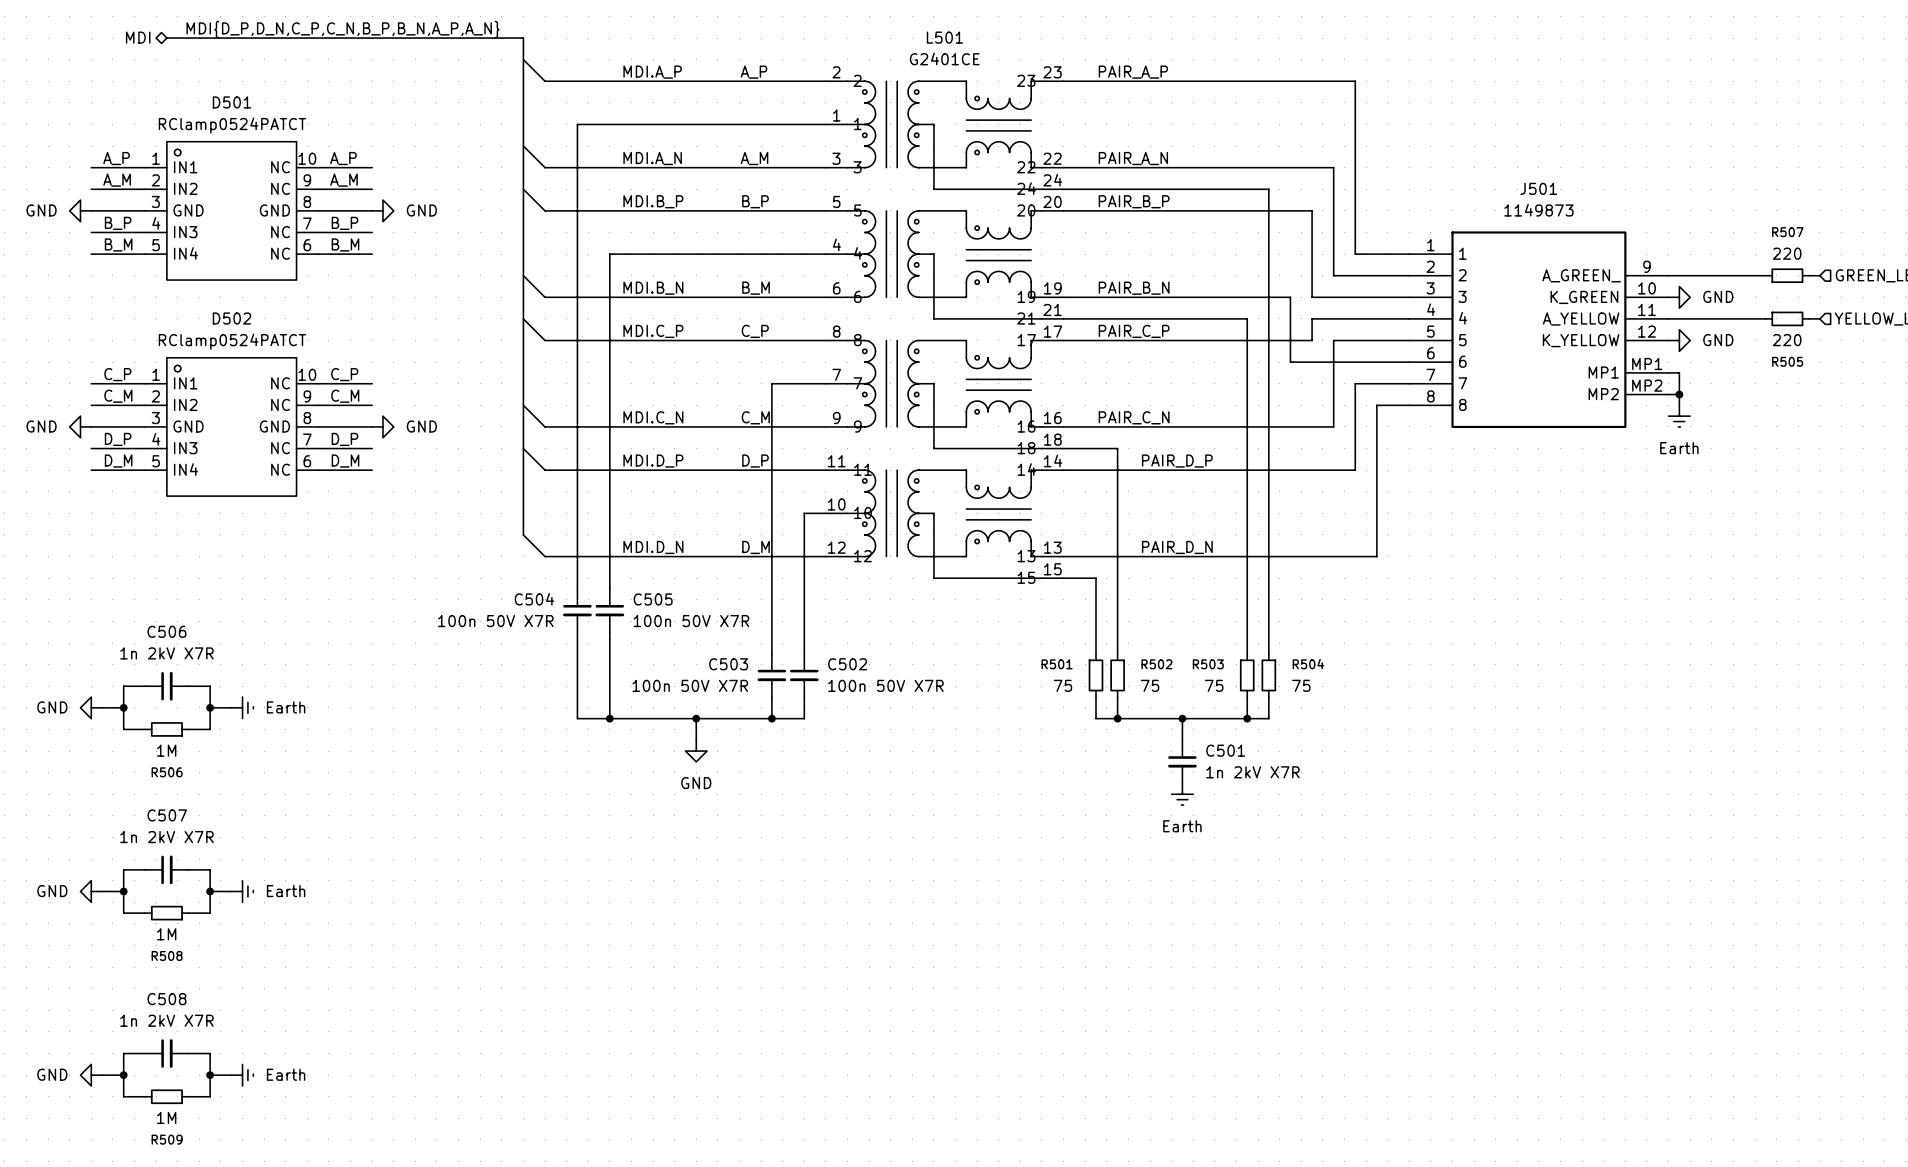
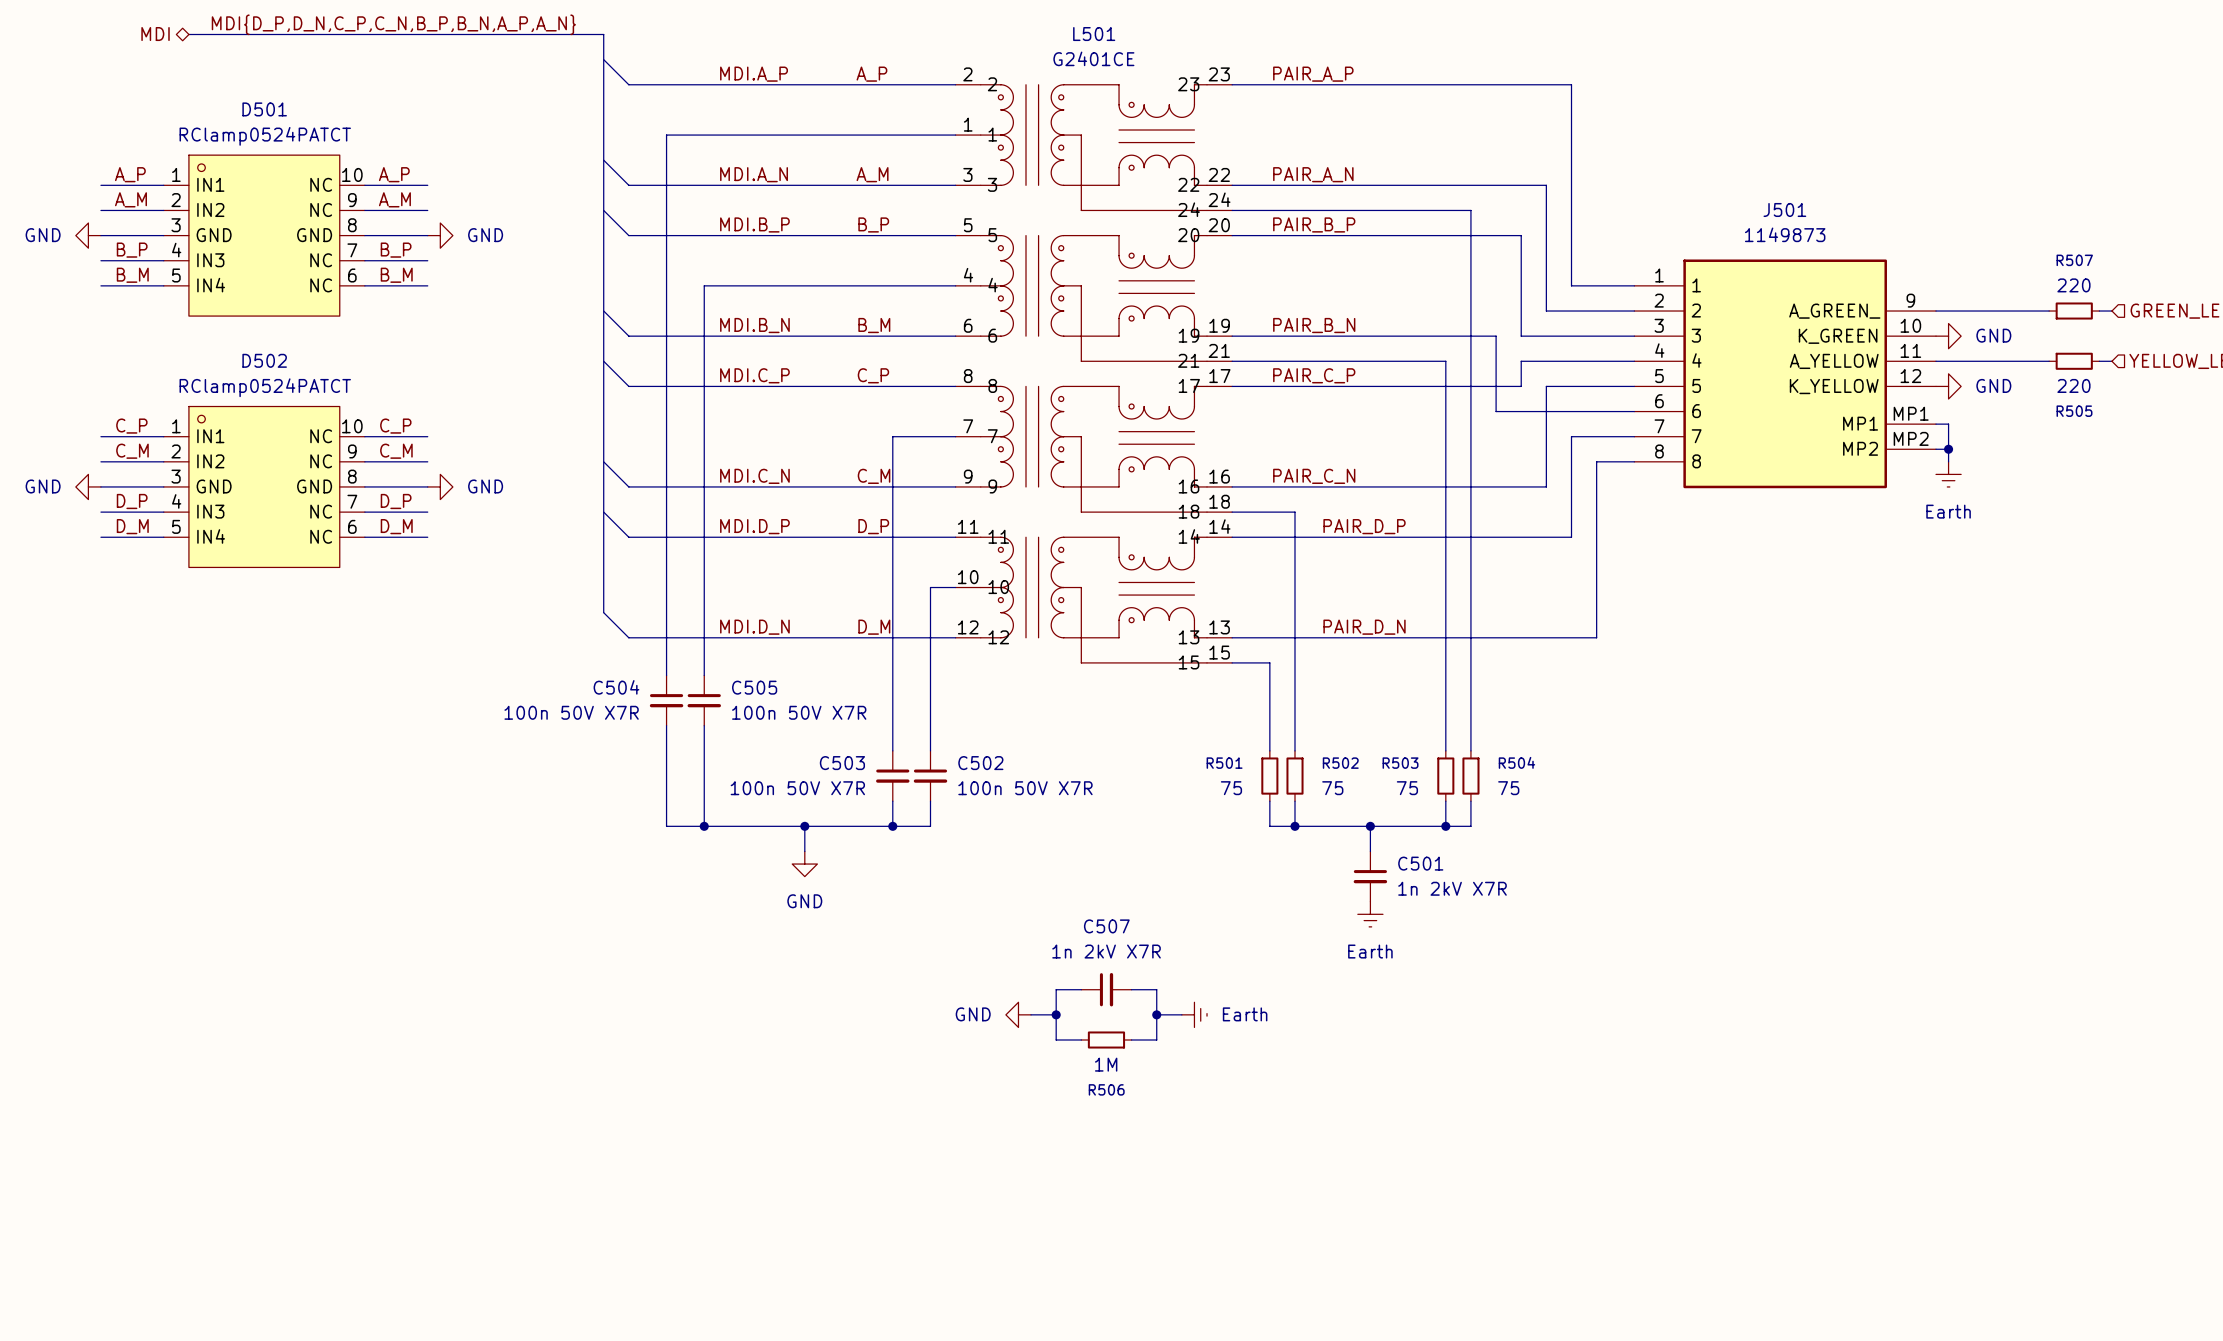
wire: (145, 686) (123, 686) (123, 729) (145, 729) -> none
C506: 1n 2kV X7R (166, 686) -> none
wire: (188, 686) (210, 686) (210, 729) (188, 729) -> none
power symbol: GND (91, 707) -> none
wire: (102, 707) (123, 707) -> none
junction: (123, 707) -> none
wire: (210, 707) (231, 707) -> none
junction: (210, 707) -> none
power symbol: Earth (242, 707) -> none
R506 position: (166, 729) -> (1106, 1040)
wire: none -> (1081, 989) (1056, 989) (1056, 1040) (1081, 1040)
wire: none -> (1131, 989) (1156, 989) (1156, 1040) (1131, 1040)
wire: (145, 869) (123, 869) (123, 913) (145, 913) -> none
C507 position: (166, 869) -> (1106, 989)
wire: (188, 869) (210, 869) (210, 913) (188, 913) -> none
power symbol: none -> GND (1018, 1014)
wire: none -> (1031, 1014) (1056, 1014)
junction: none -> (1056, 1014)
wire: none -> (1156, 1014) (1181, 1014)
junction: none -> (1156, 1014)
power symbol: none -> Earth (1194, 1014)
power symbol: GND (91, 891) -> none
wire: (102, 891) (123, 891) -> none
junction: (123, 891) -> none
wire: (210, 891) (231, 891) -> none
junction: (210, 891) -> none
power symbol: Earth (242, 891) -> none
R508: 1M (166, 913) -> none
wire: (145, 1053) (123, 1053) (123, 1096) (145, 1096) -> none
C508: 1n 2kV X7R (166, 1053) -> none
wire: (188, 1053) (210, 1053) (210, 1096) (188, 1096) -> none
power symbol: GND (91, 1075) -> none
wire: (102, 1075) (123, 1075) -> none
junction: (123, 1075) -> none
wire: (210, 1075) (231, 1075) -> none
junction: (210, 1075) -> none
power symbol: Earth (242, 1075) -> none
R509: 1M (166, 1096) -> none

